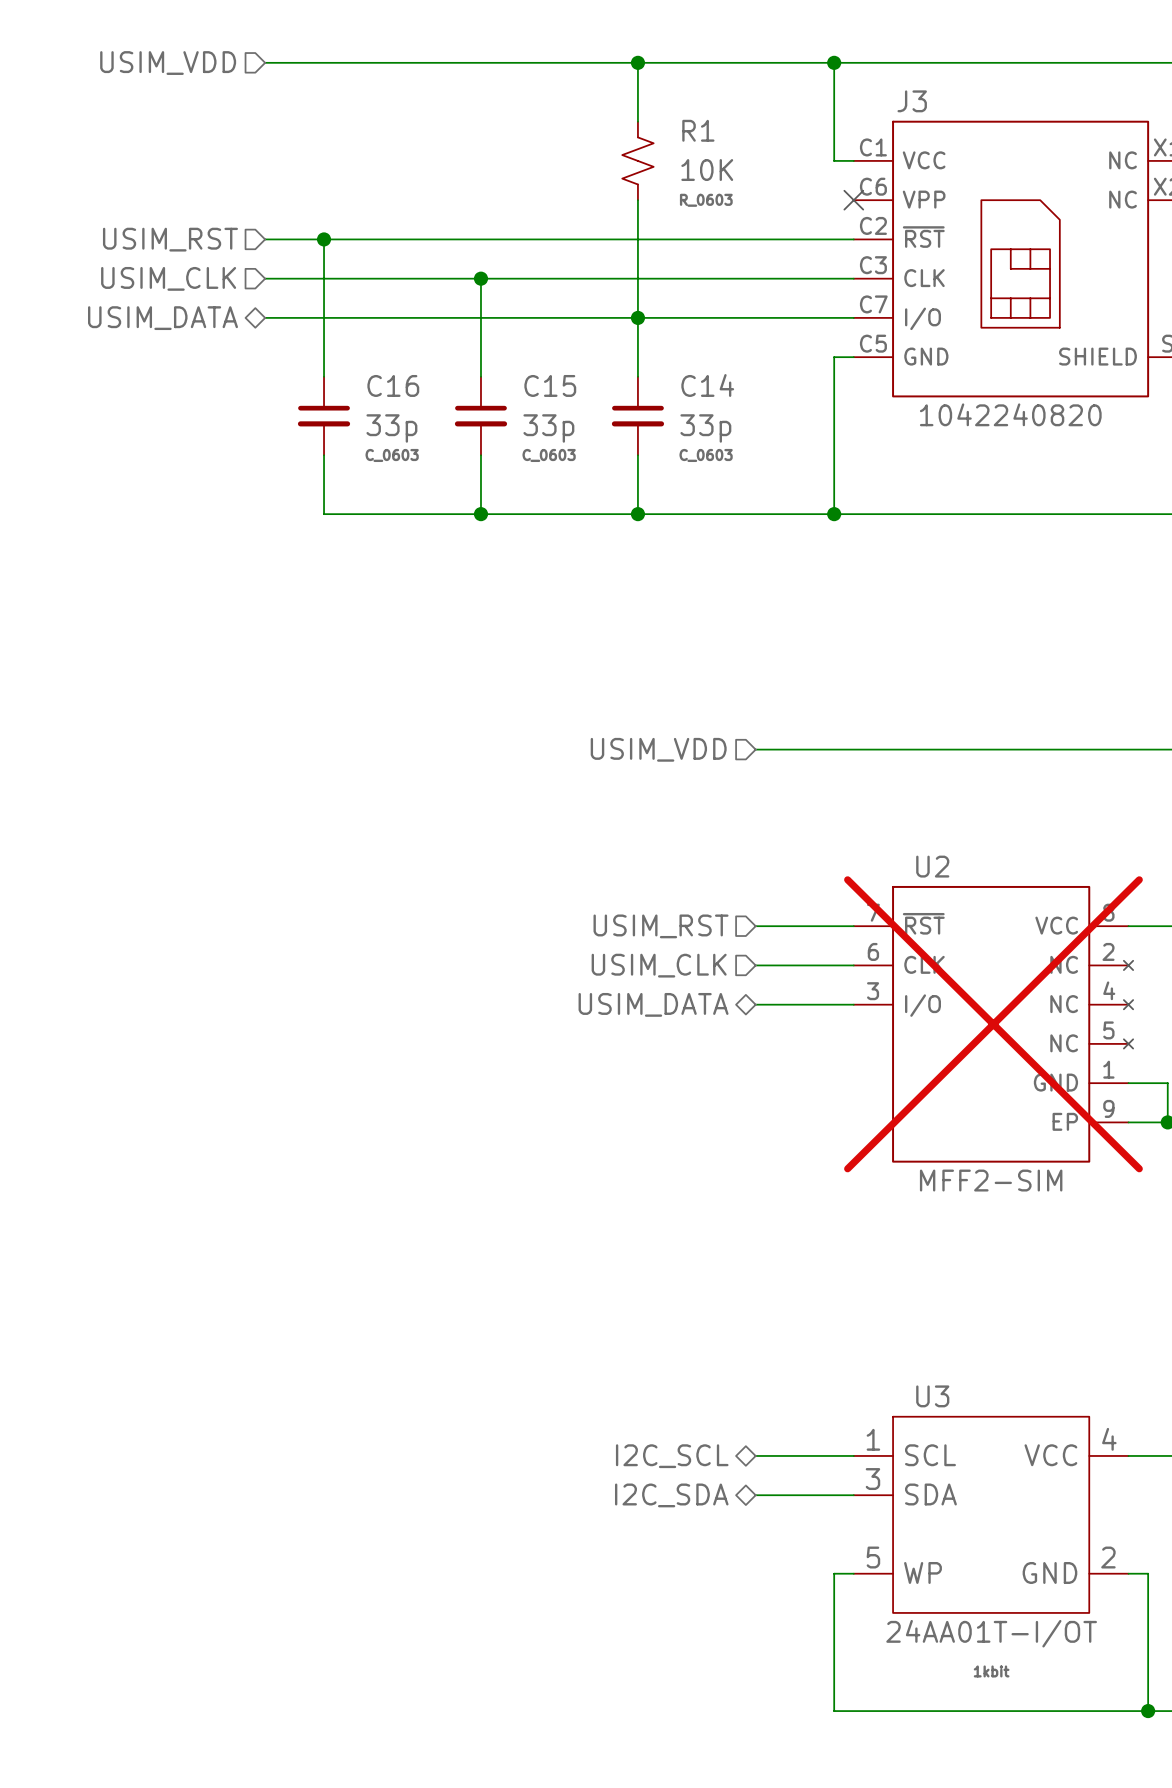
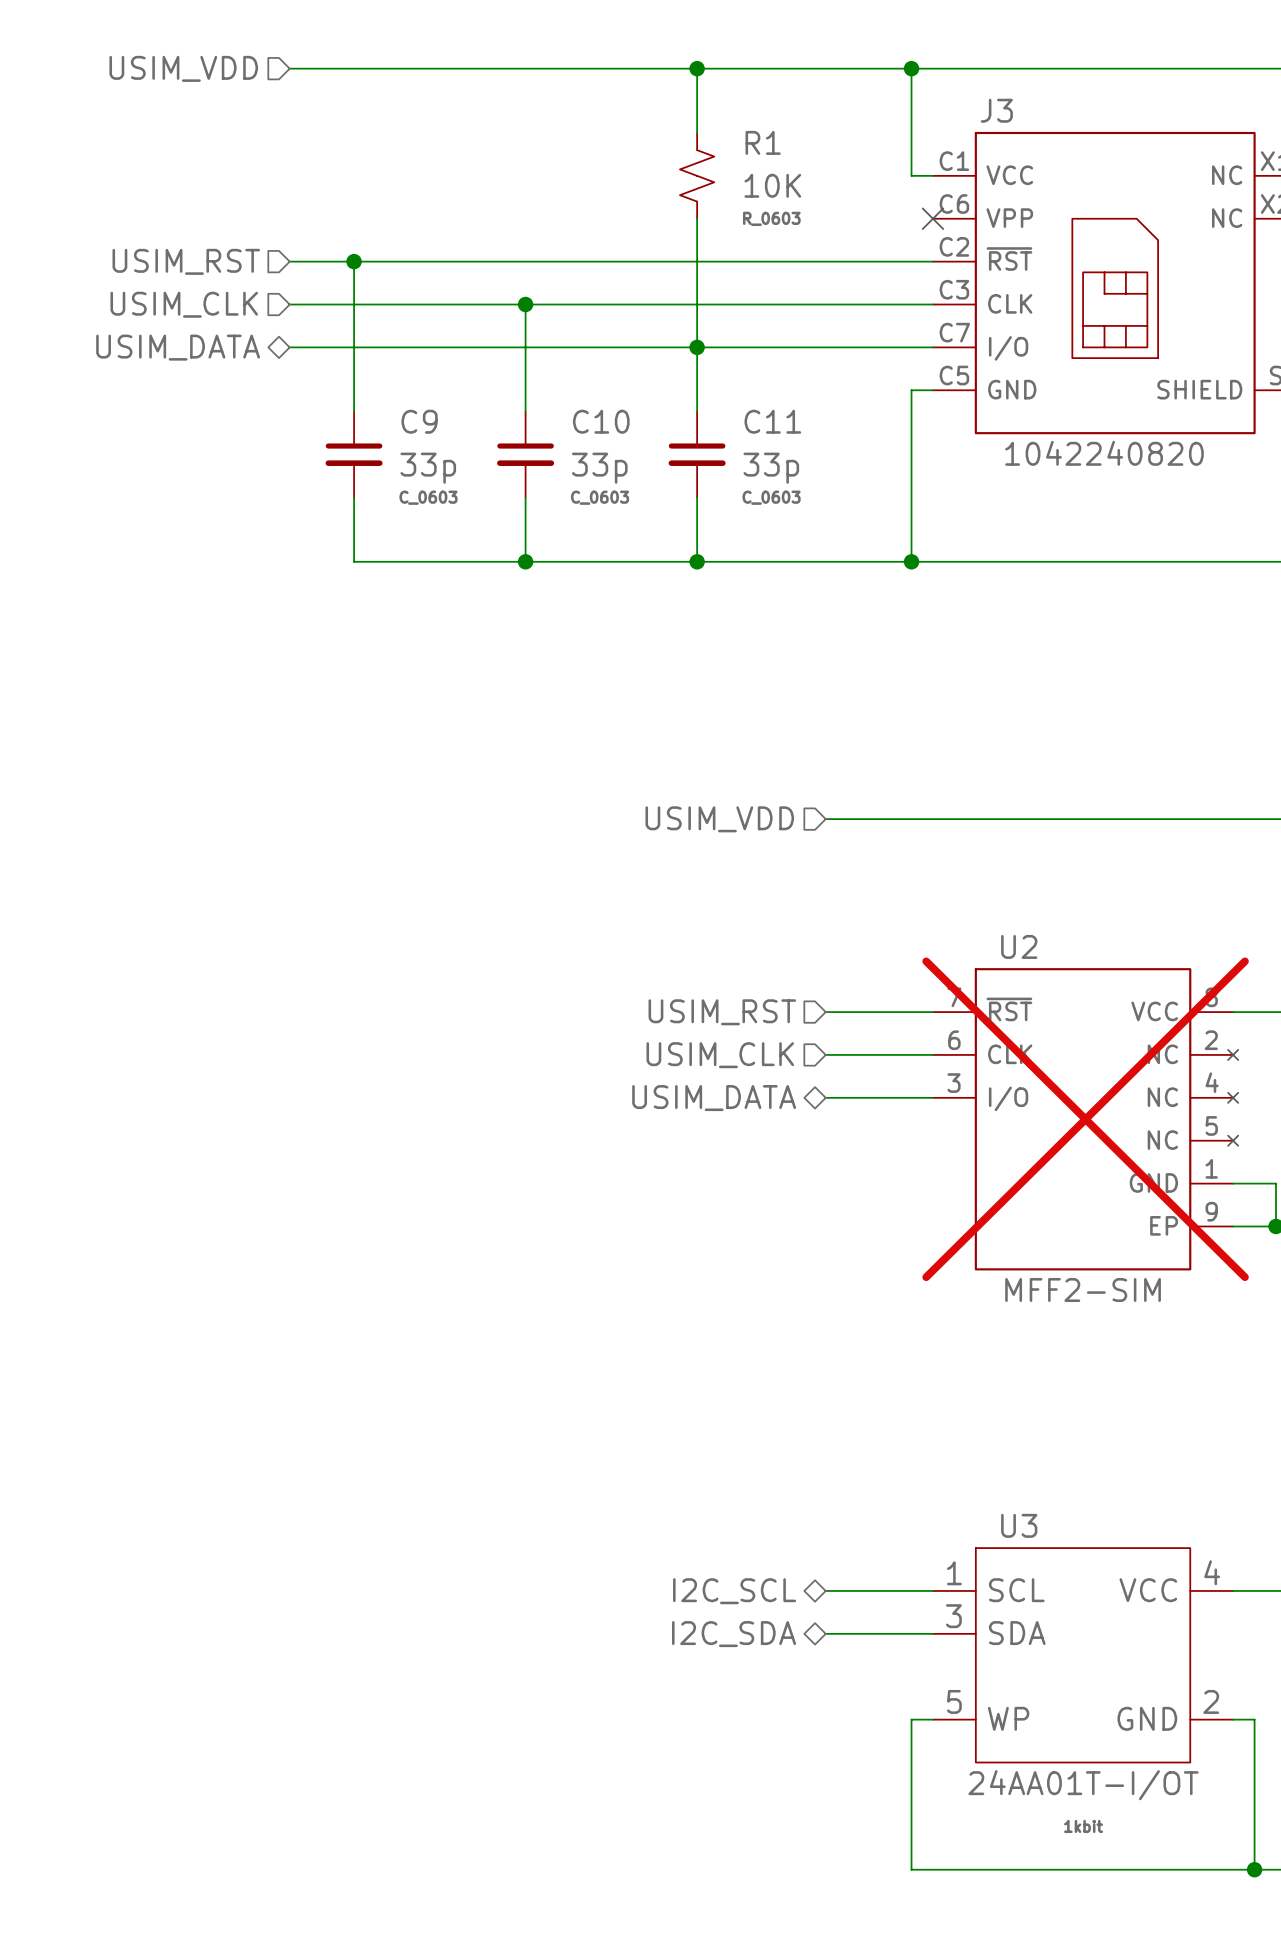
C16 name: C16 (393, 385) -> C9 (419, 421)
C15 name: C15 (550, 385) -> C10 (601, 421)
C14 name: C14 (707, 385) -> C11 (772, 421)

